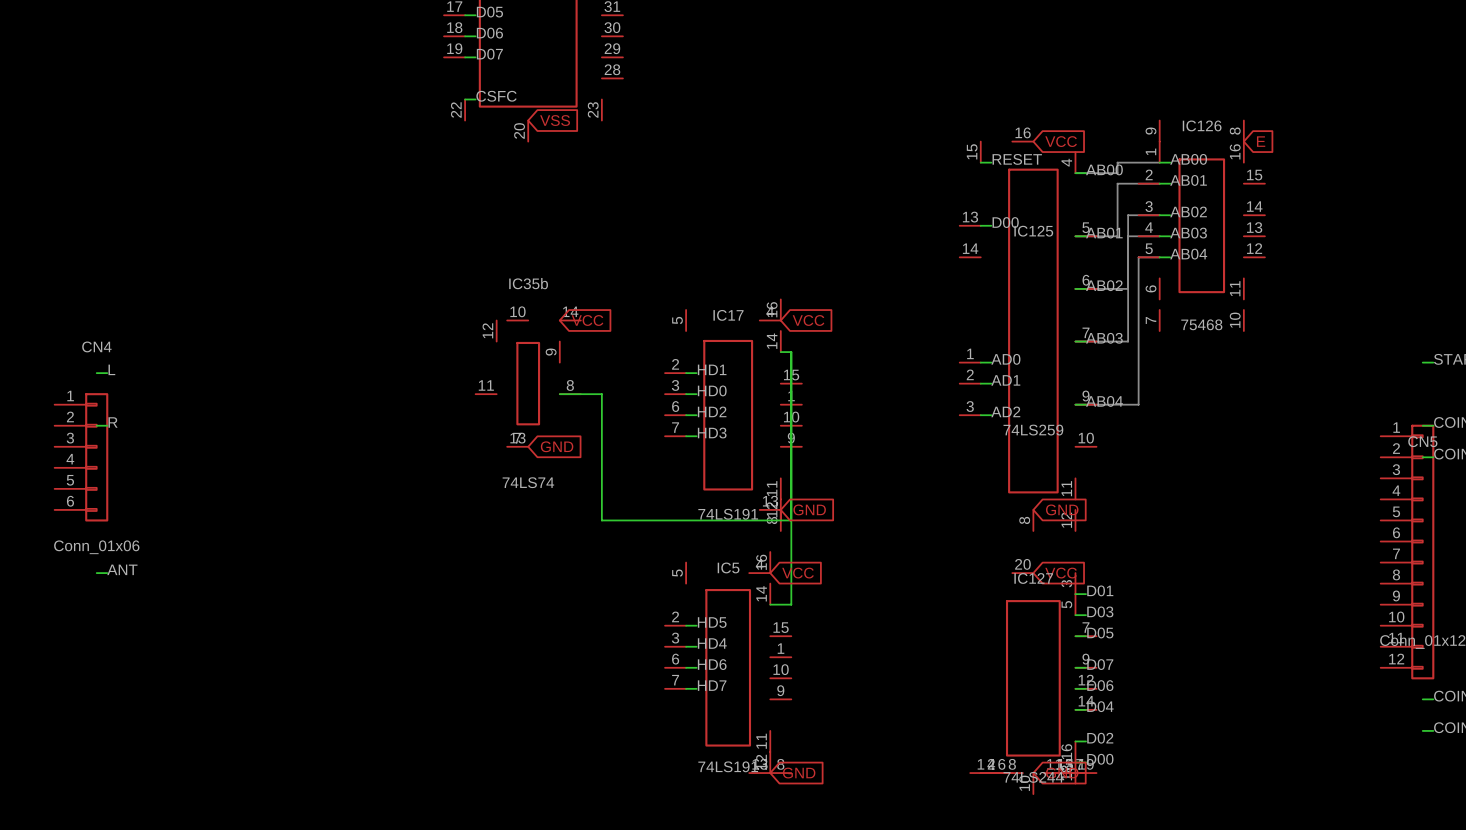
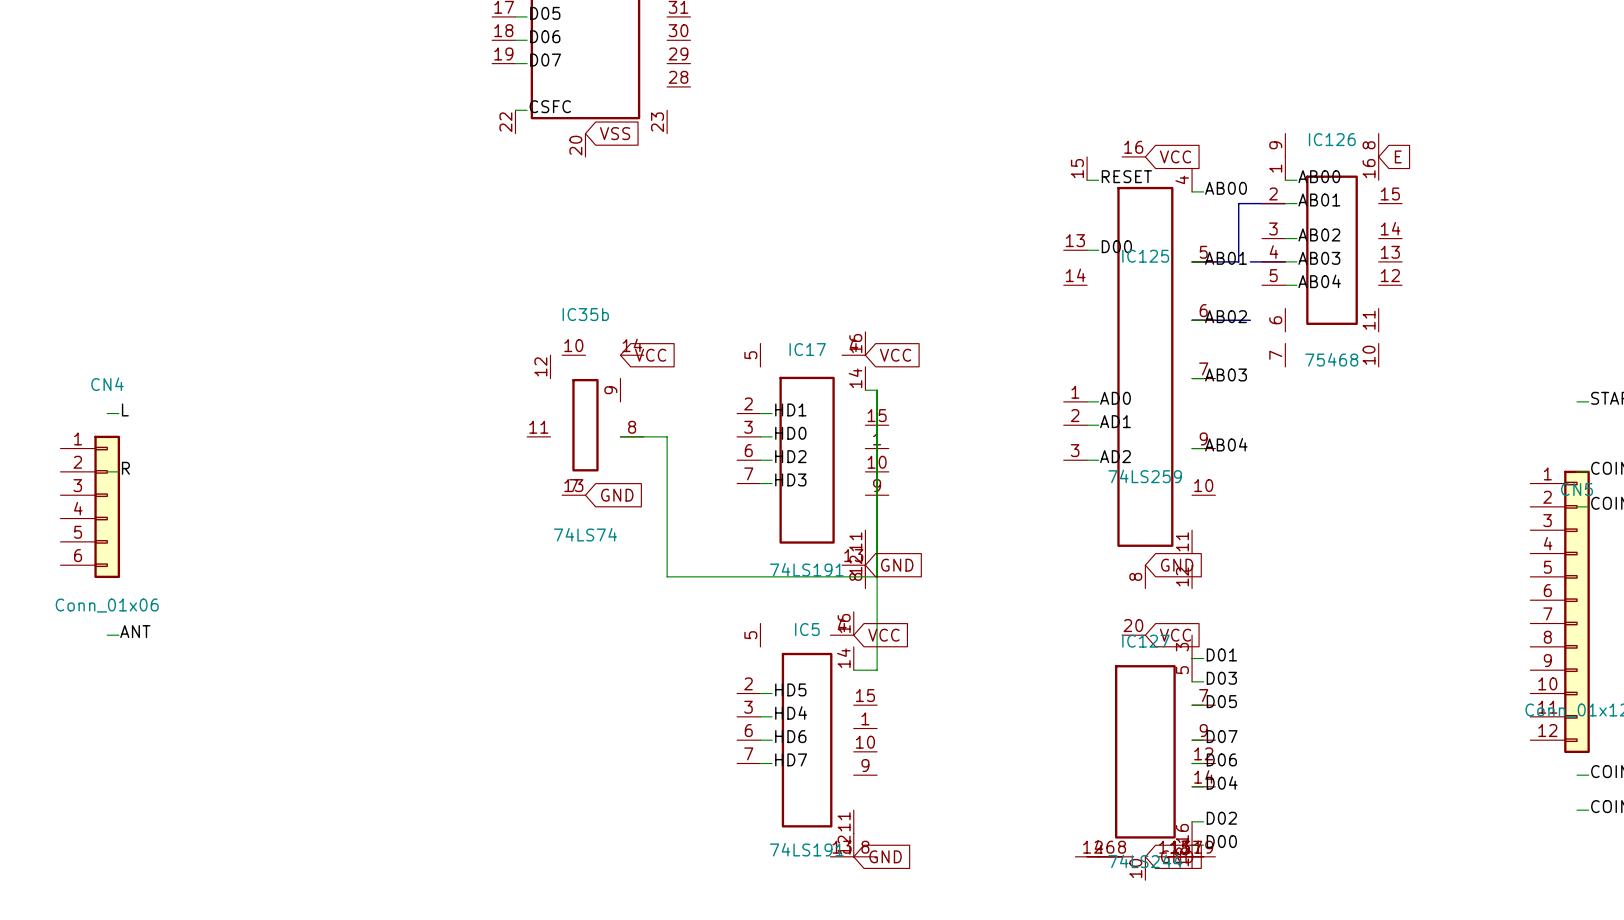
line: (1159, 162) (1117, 162) (1117, 173) (1075, 173) -> none
line: (1159, 215) (1128, 215) (1128, 341) (1075, 341) -> none
line: (1159, 257) (1138, 257) (1138, 404) (1075, 404) -> none

